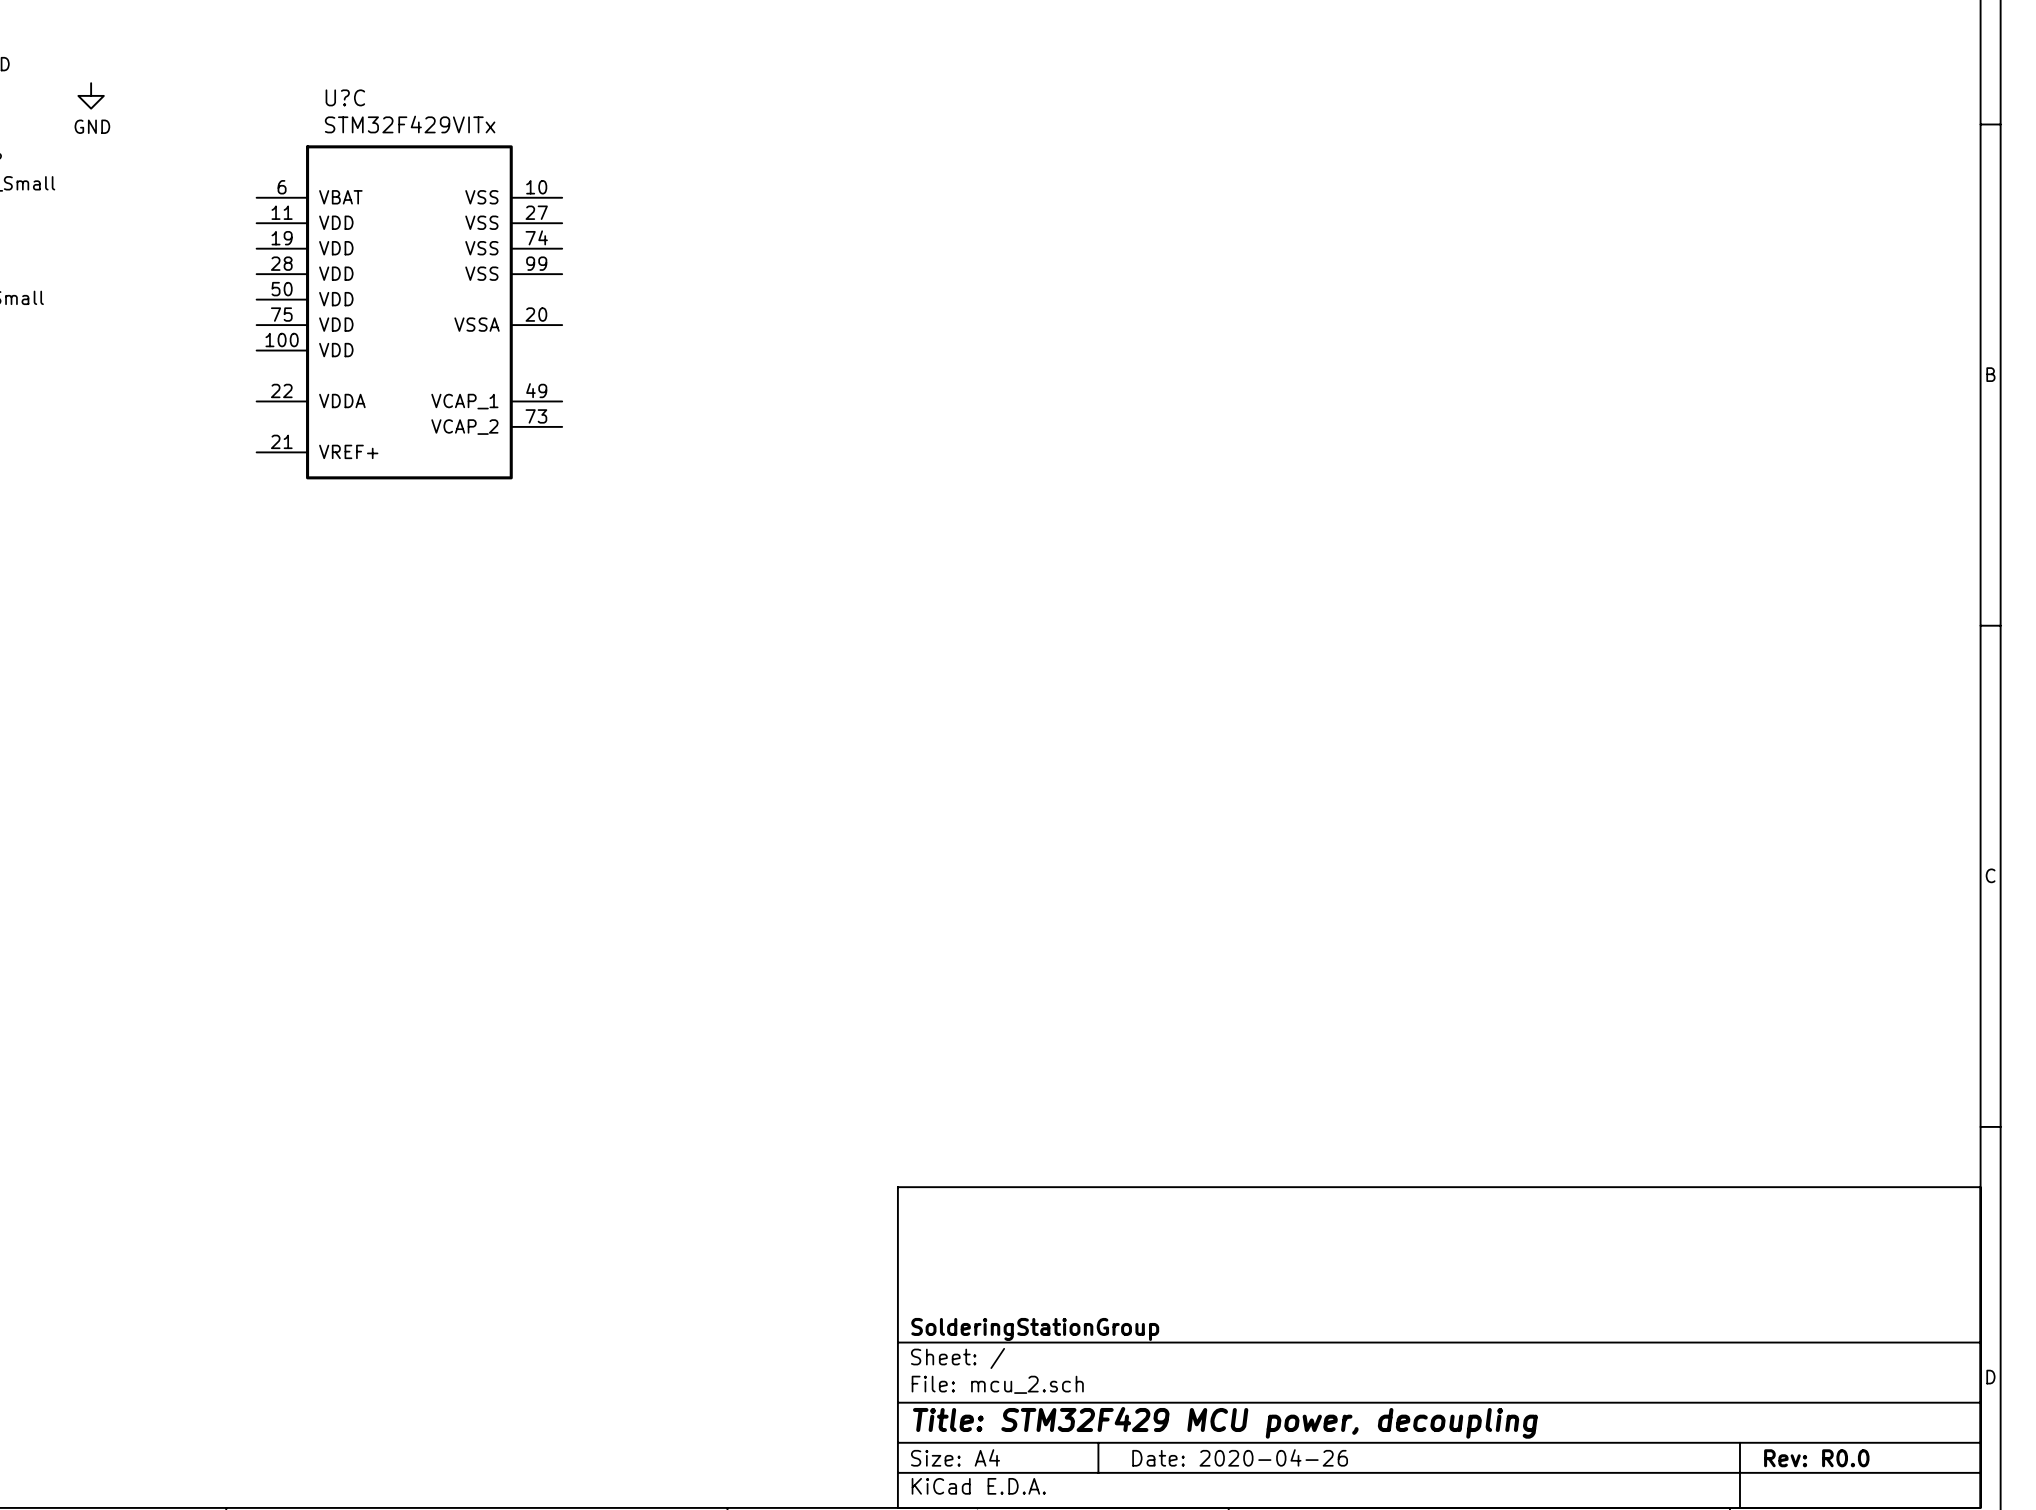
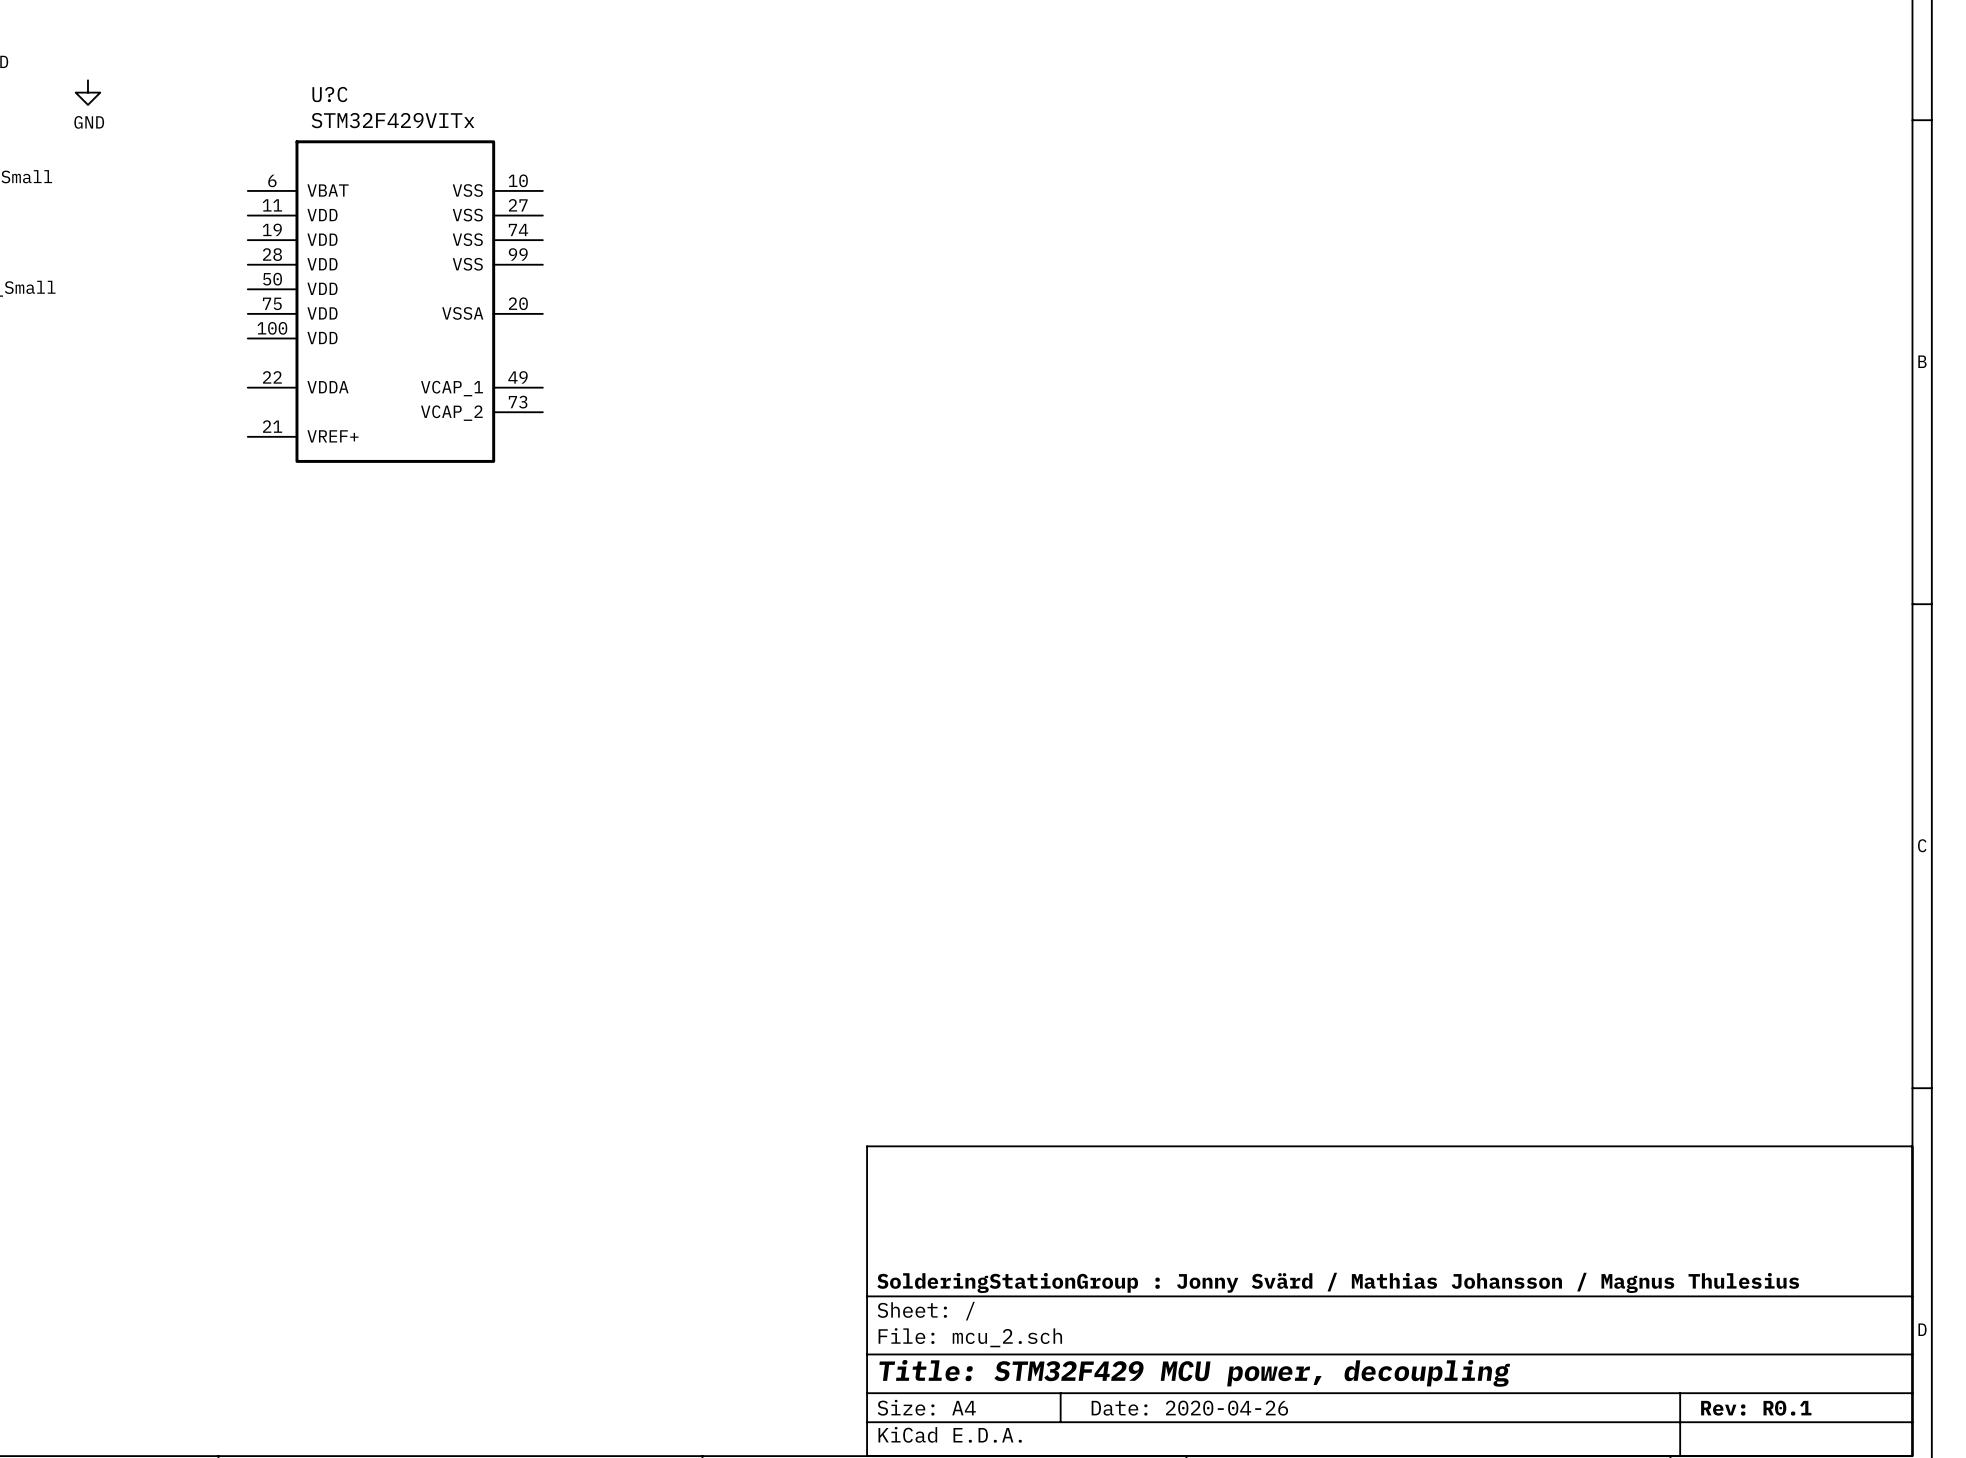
title block: SolderingStationGroup (1035, 1329) -> SolderingStationGroup : Jonny Svärd / Mathias Johansson / Magnus Thulesius (1338, 1282)
title block: Rev: R0.0 (1816, 1458) -> Rev: R0.1 (1756, 1408)

